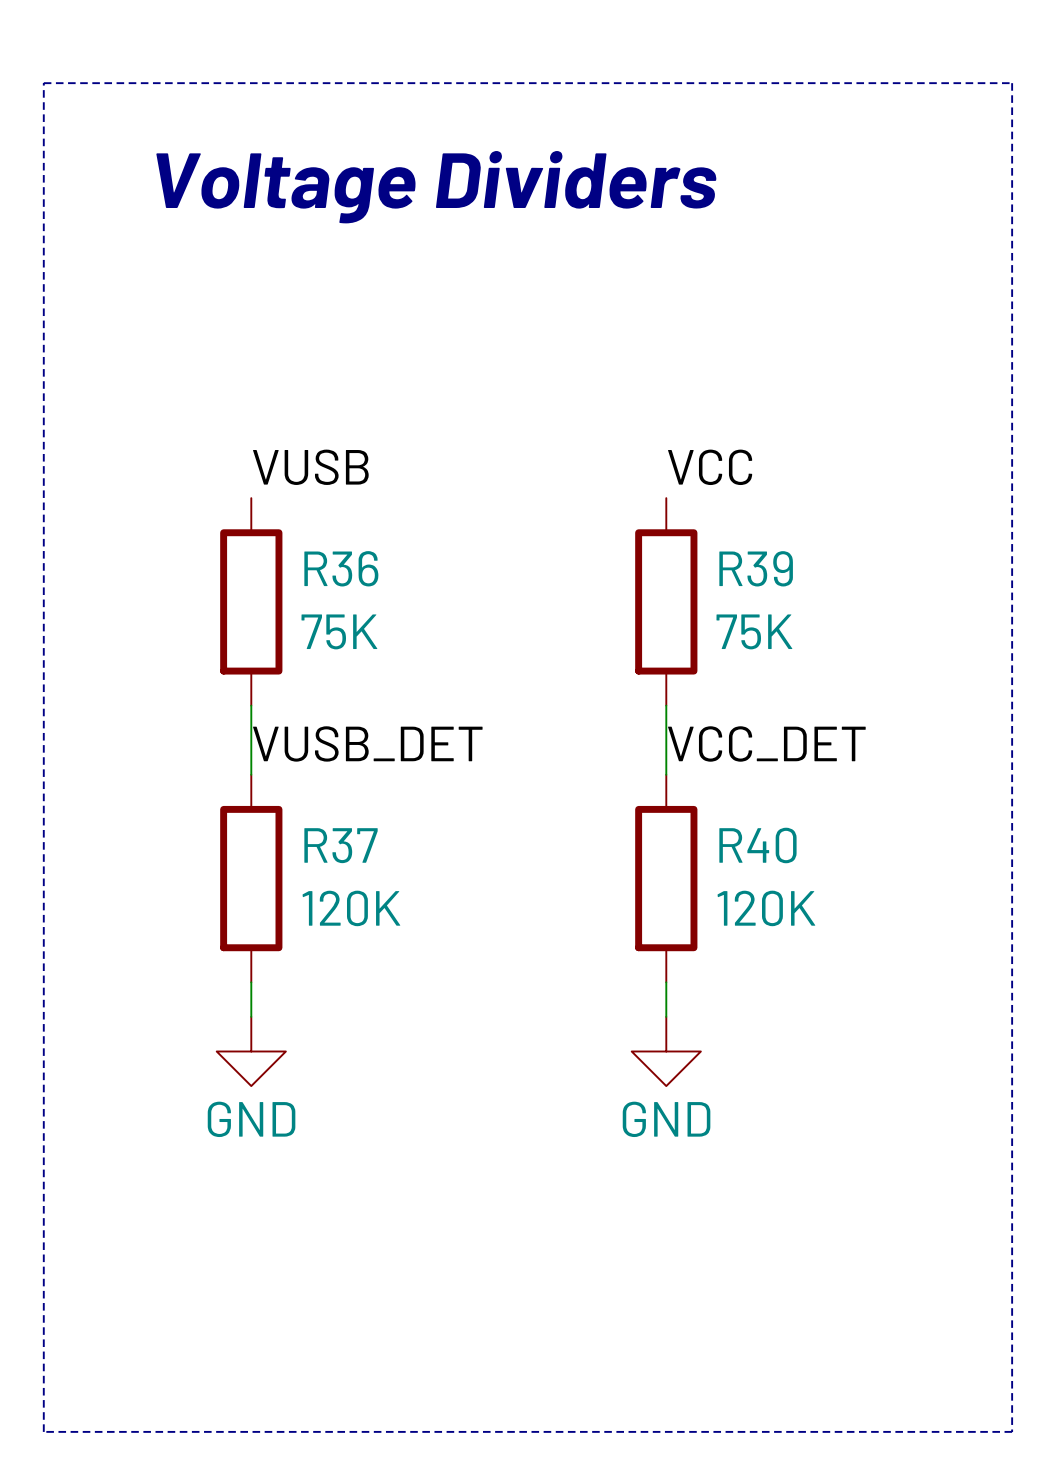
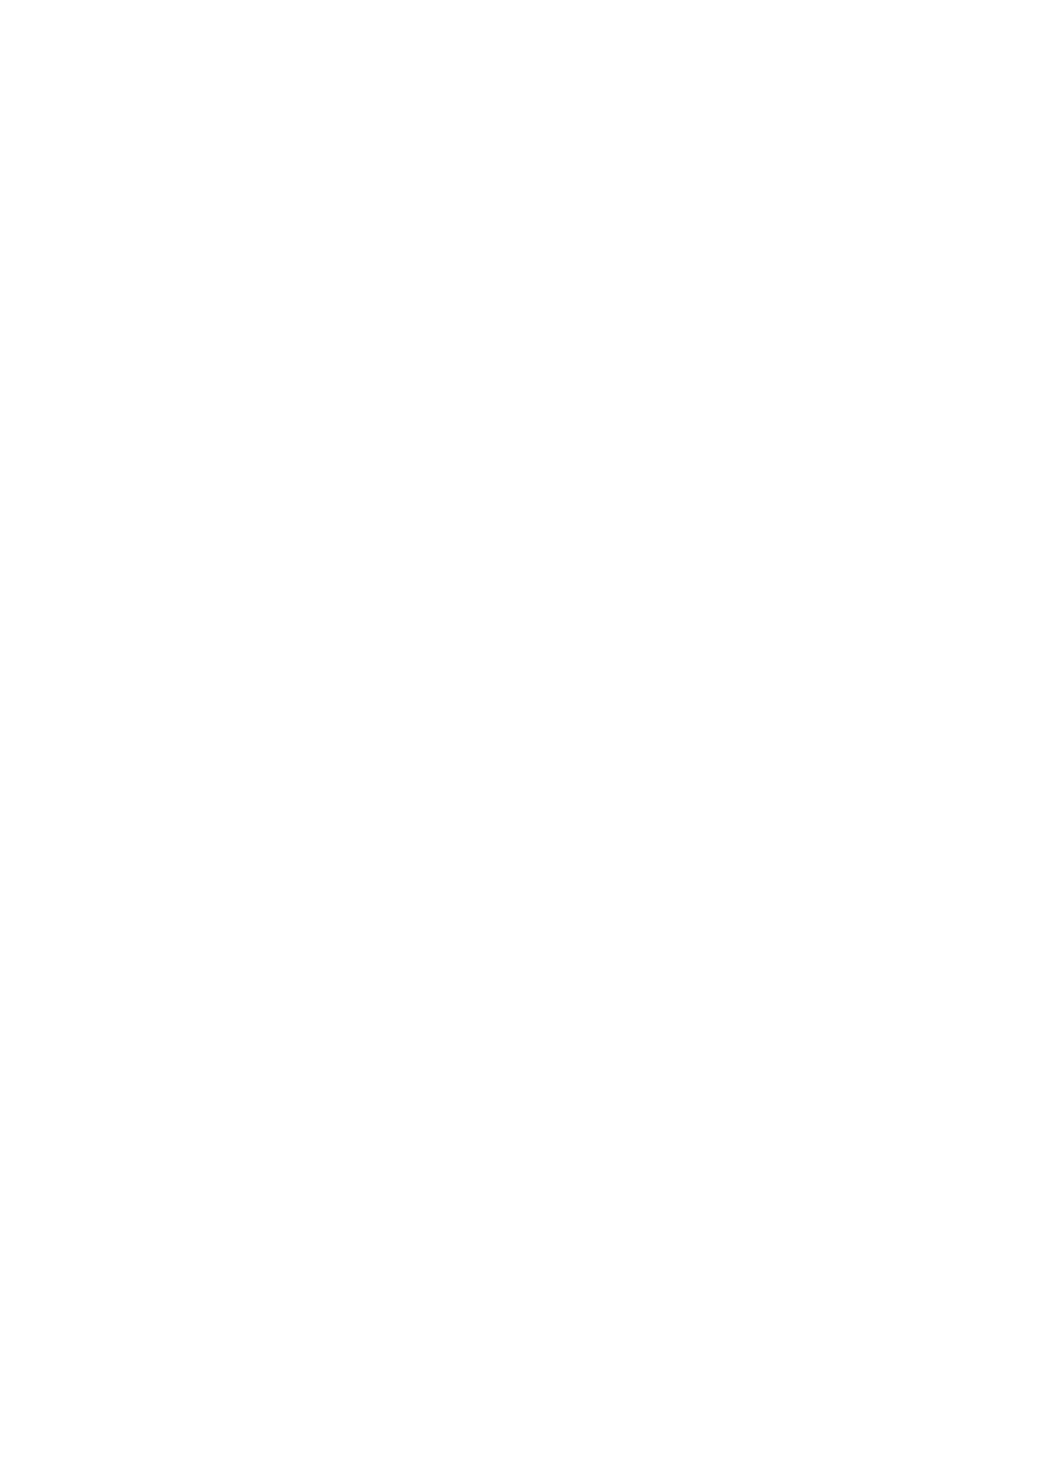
line: (43, 83) (43, 1431) (1012, 1431) (1012, 83) (43, 83) -> none
text: Voltage Dividers (436, 187) -> none
label: VUSB (310, 467) -> none
label: VCC (710, 467) -> none
R36: 75K (251, 601) -> none
R39: 75K (666, 601) -> none
wire: (251, 705) (251, 774) -> none
wire: (666, 705) (666, 774) -> none
label: VUSB_DET (367, 743) -> none
label: VCC_DET (766, 743) -> none
R37: 120K (251, 878) -> none
R40: 120K (666, 878) -> none
wire: (251, 982) (251, 1016) -> none
wire: (666, 982) (666, 1016) -> none
power symbol: GND (251, 1051) -> none
power symbol: GND (666, 1051) -> none

